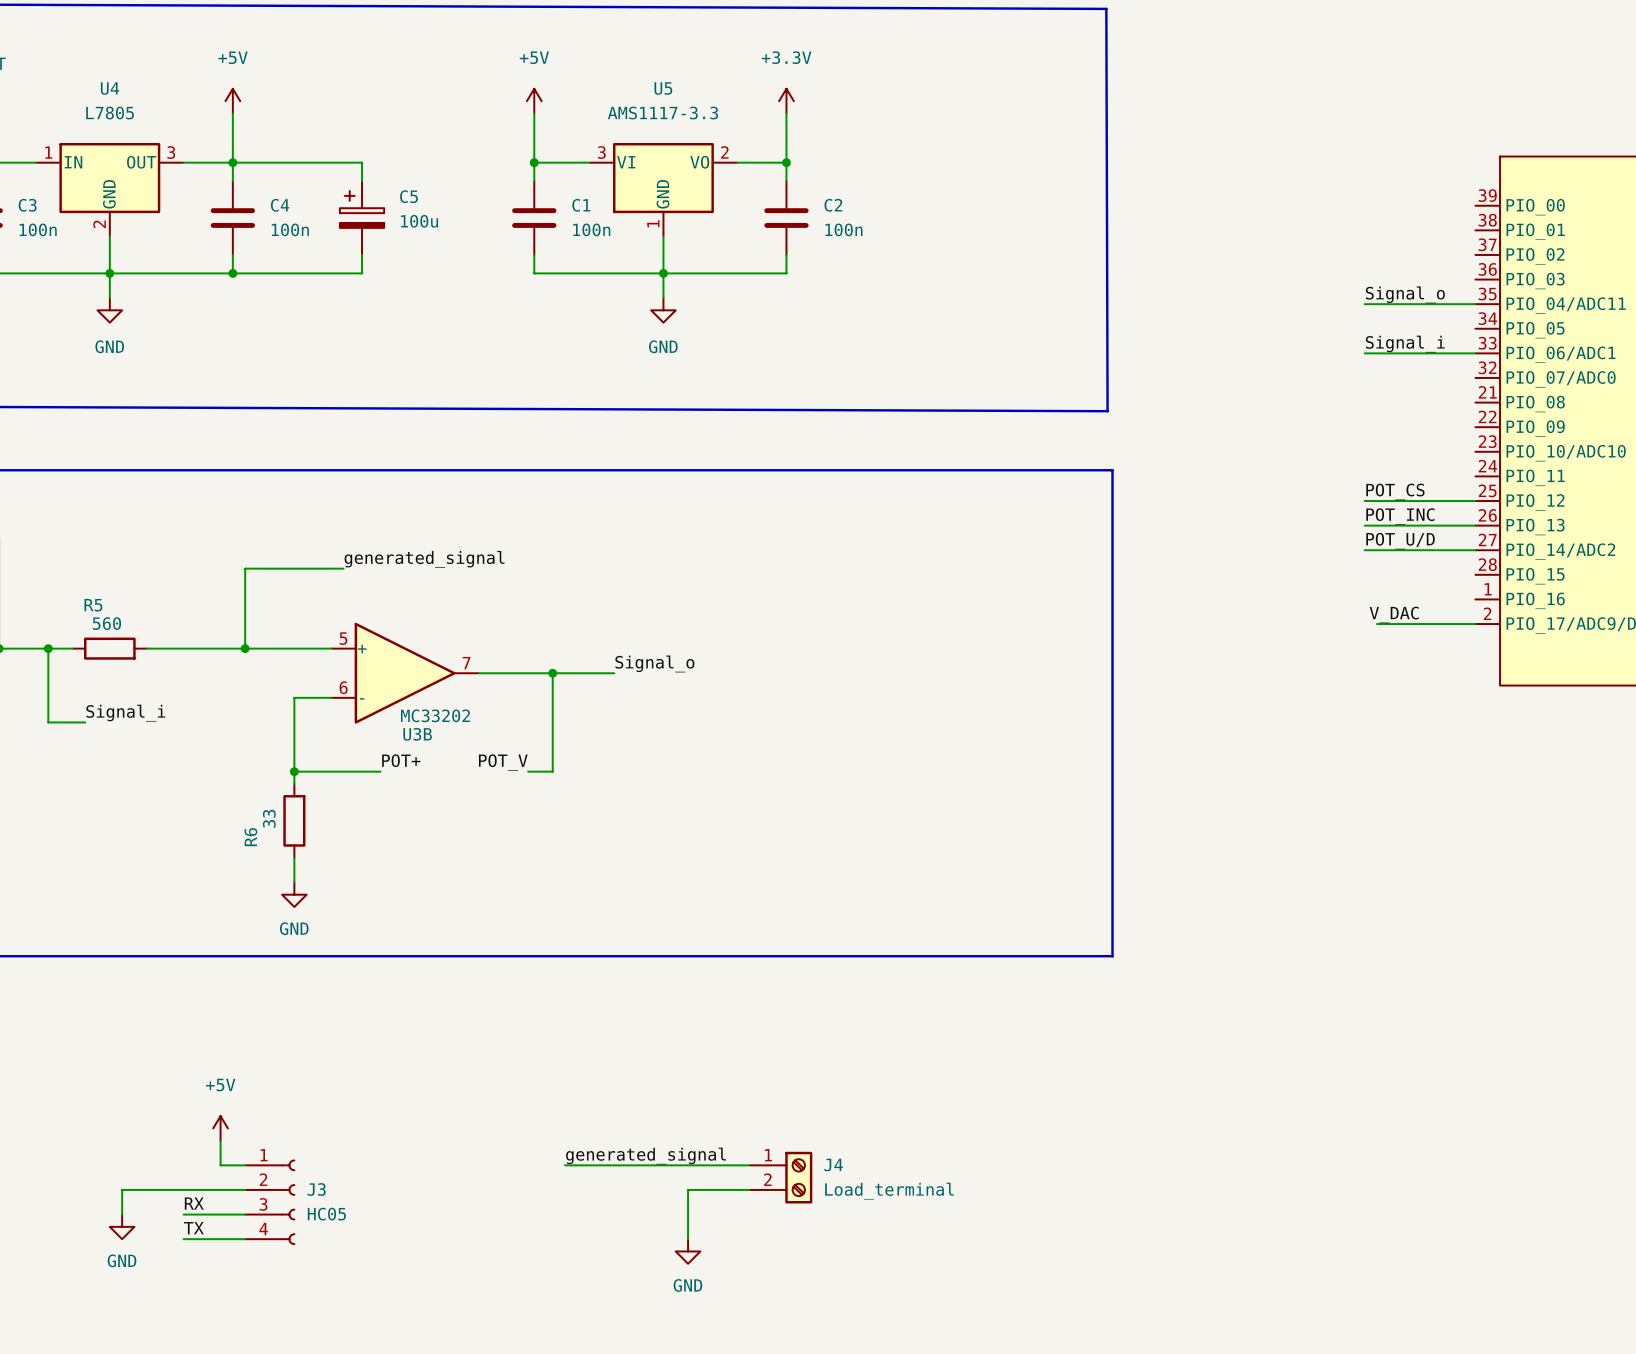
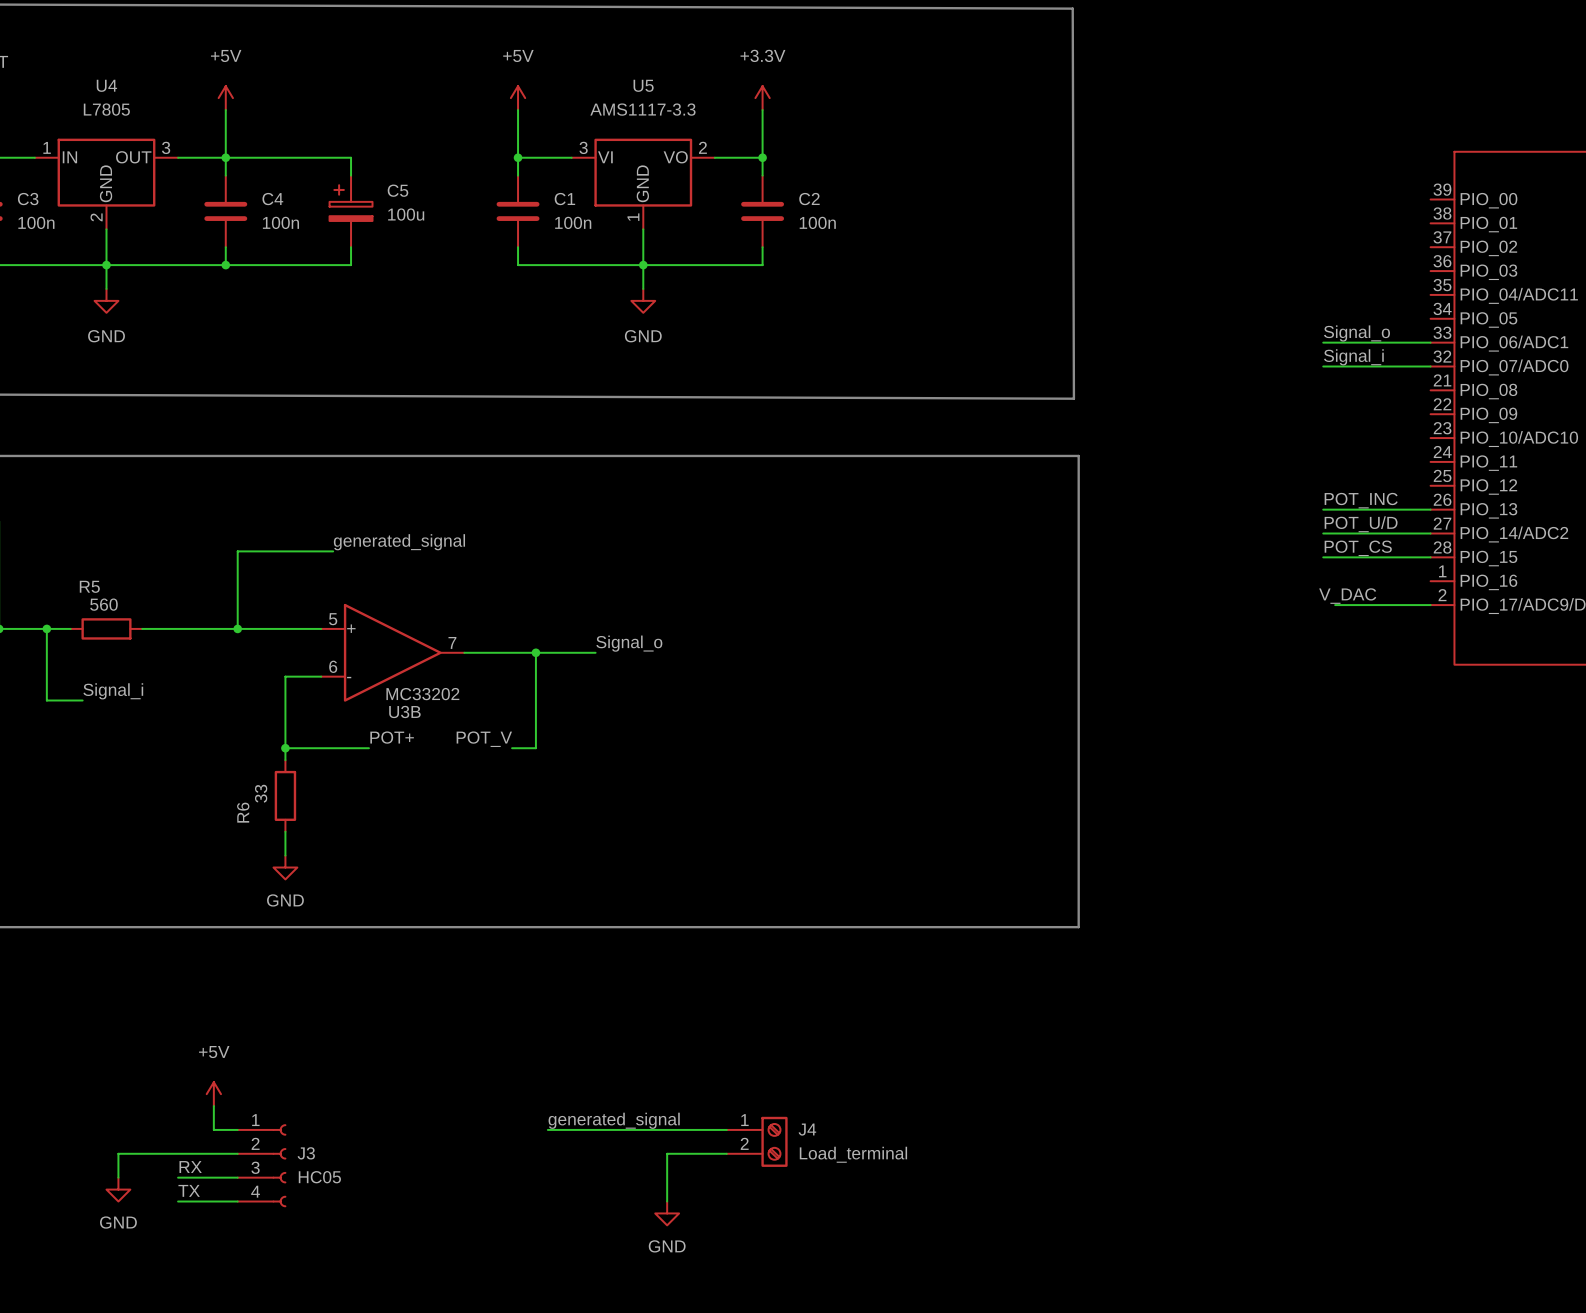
label: Signal_o (1405, 294) -> none
wire: (1364, 304) (1475, 304) -> (1323, 366) (1430, 366)
label: Signal_i (1405, 344) -> Signal_o (1357, 333)
label: none -> Signal_i (1353, 357)
label position: POT_CS (1395, 491) -> POT_CS (1358, 548)
wire: (1364, 501) (1475, 501) -> (1323, 557) (1430, 557)

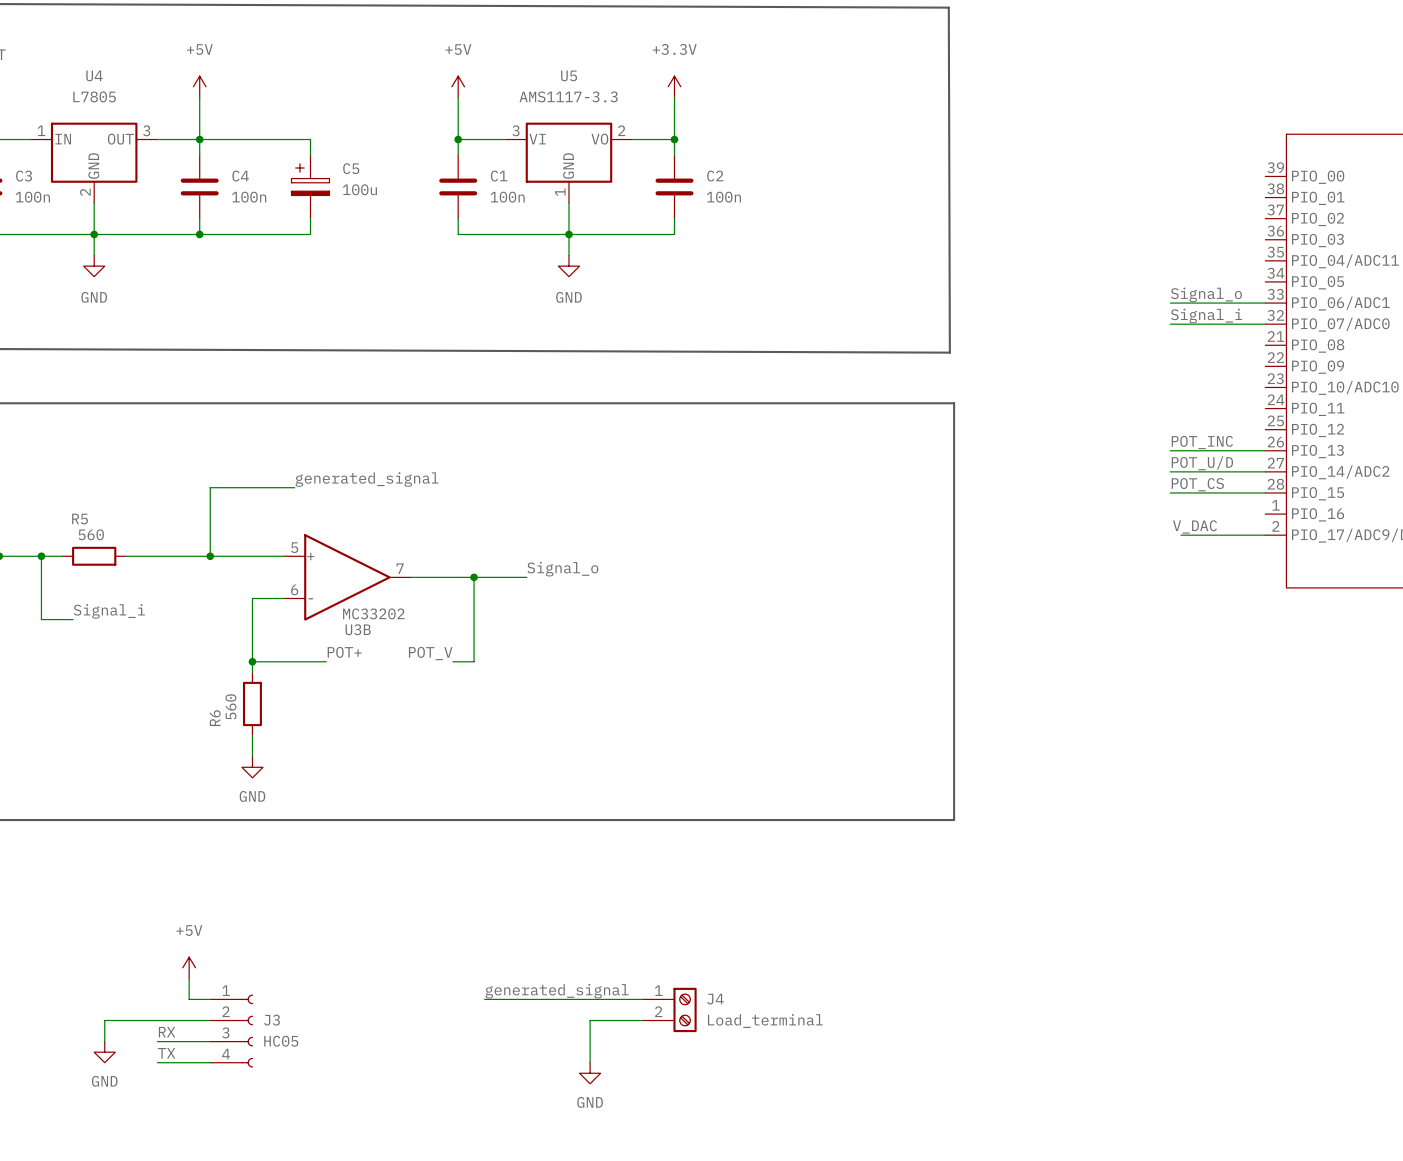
R6 value: 33 (261, 793) -> 560 (230, 706)

